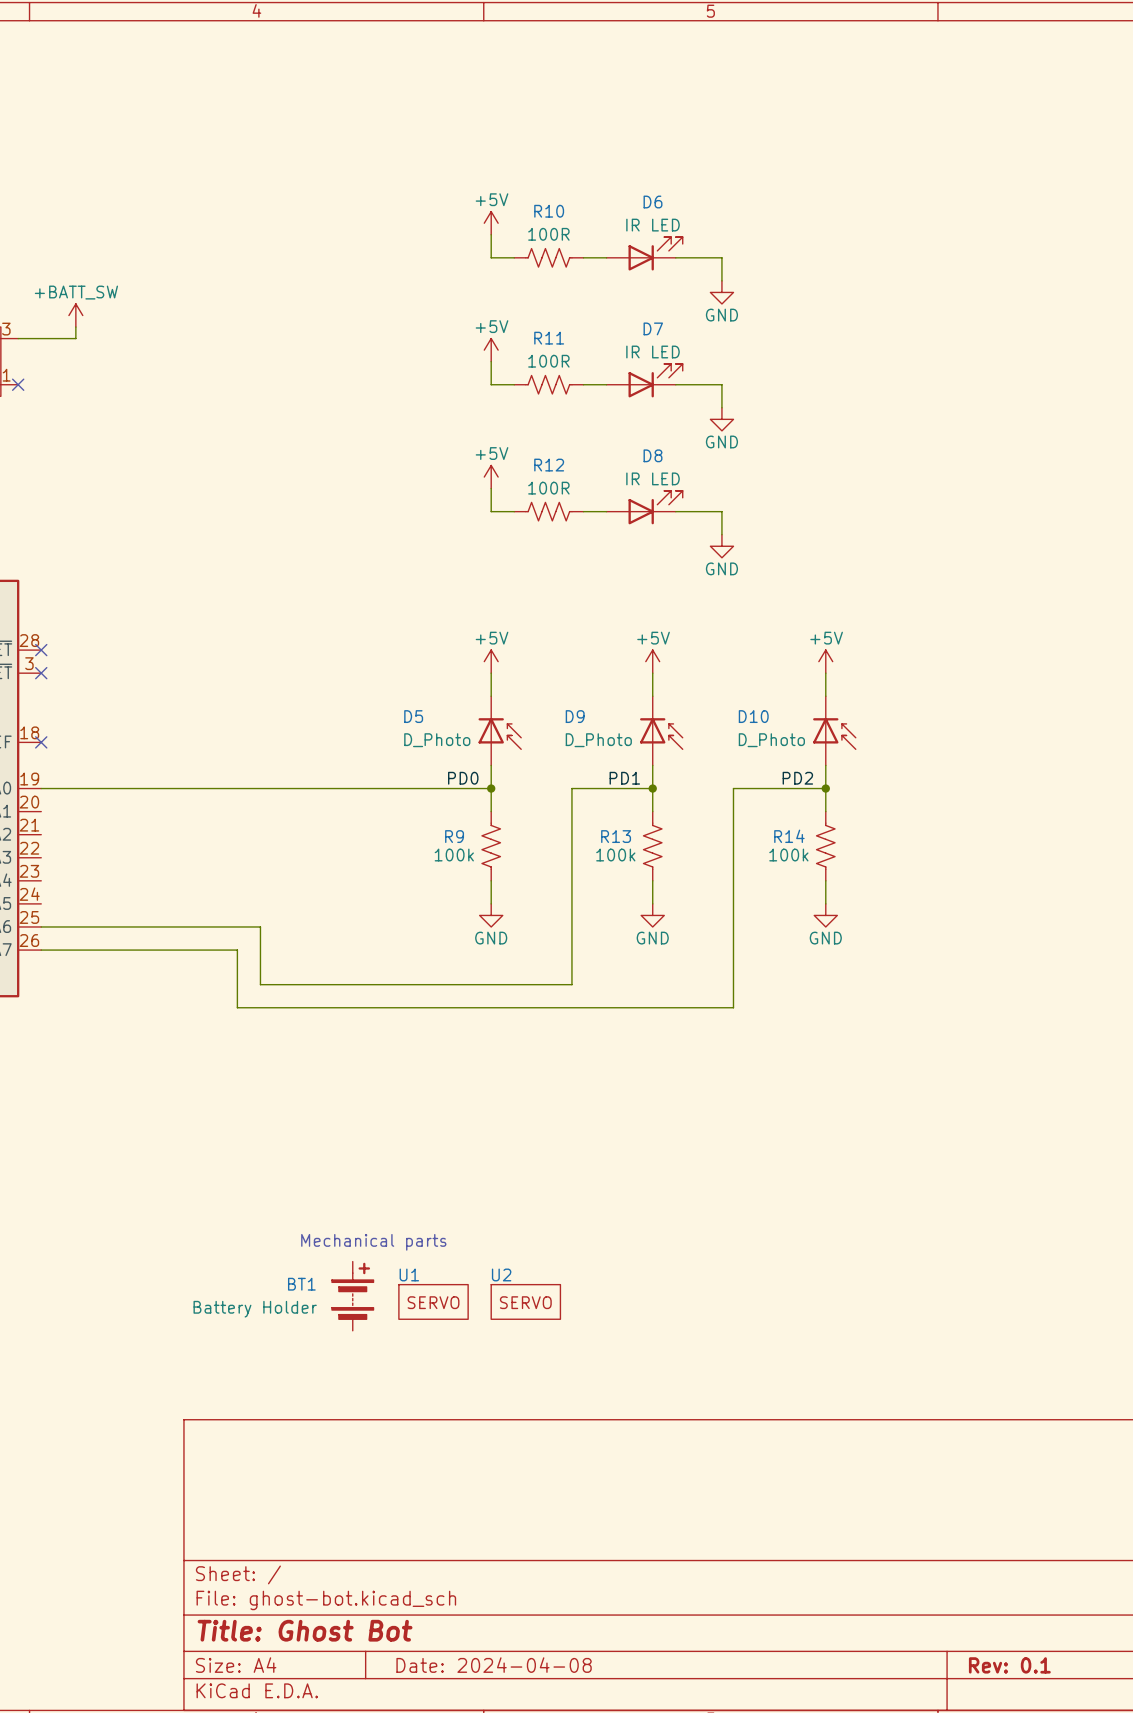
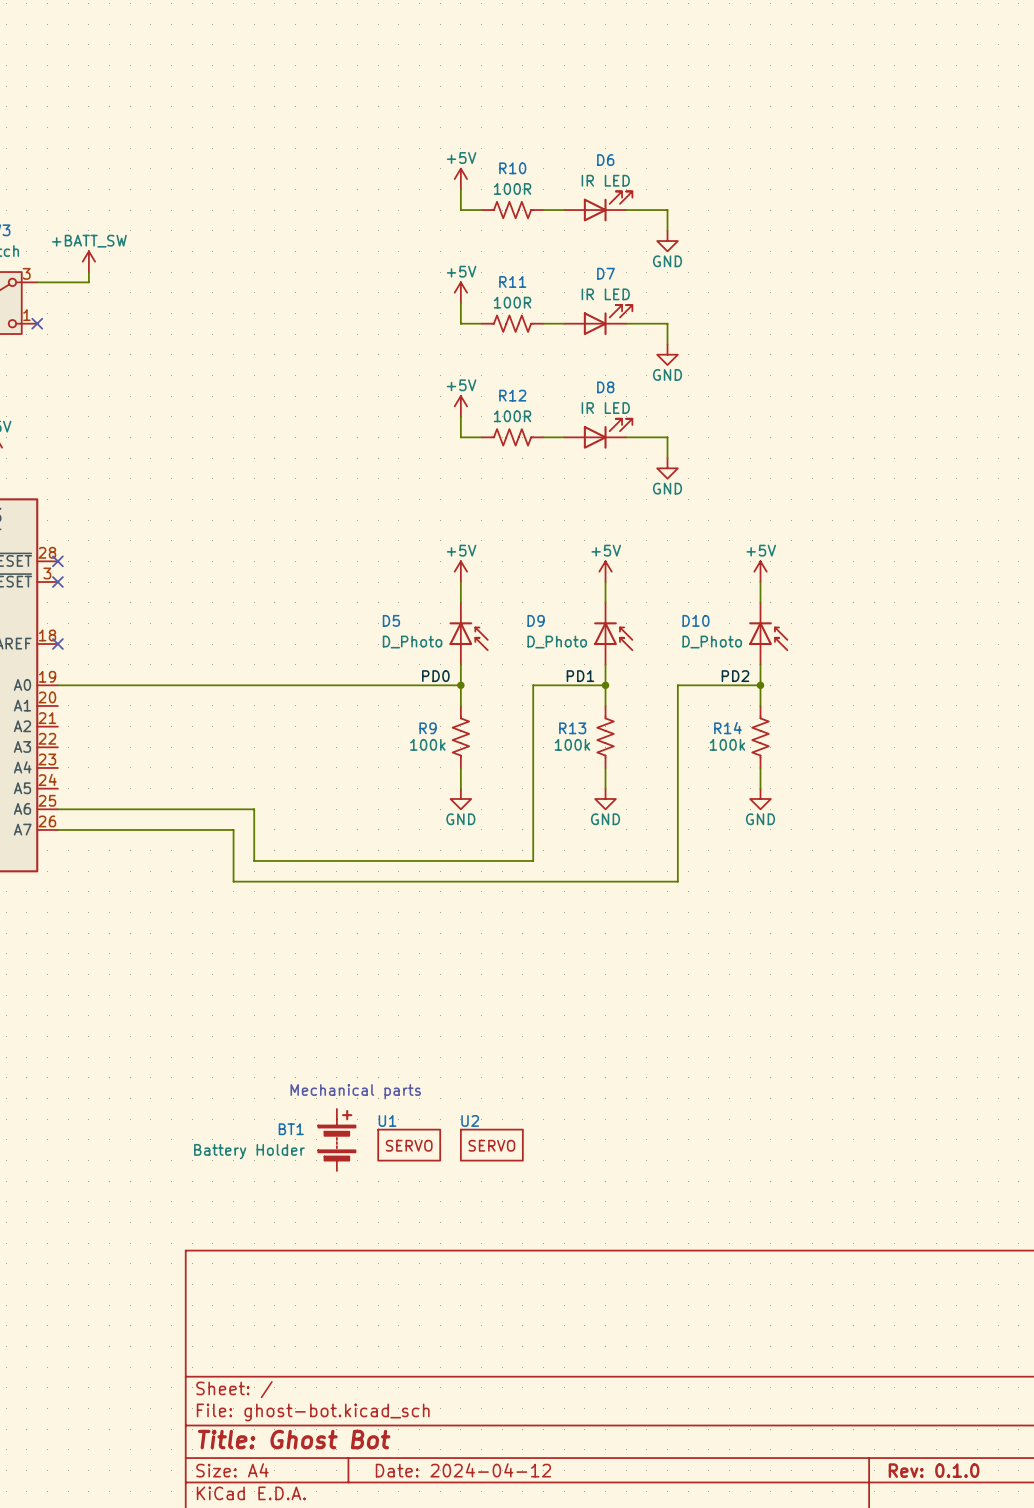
title block: Date: 2024-04-08 (494, 1665) -> Date: 2024-04-12 (463, 1470)
title block: Rev: 0.1 (1009, 1665) -> Rev: 0.1.0 (934, 1470)

